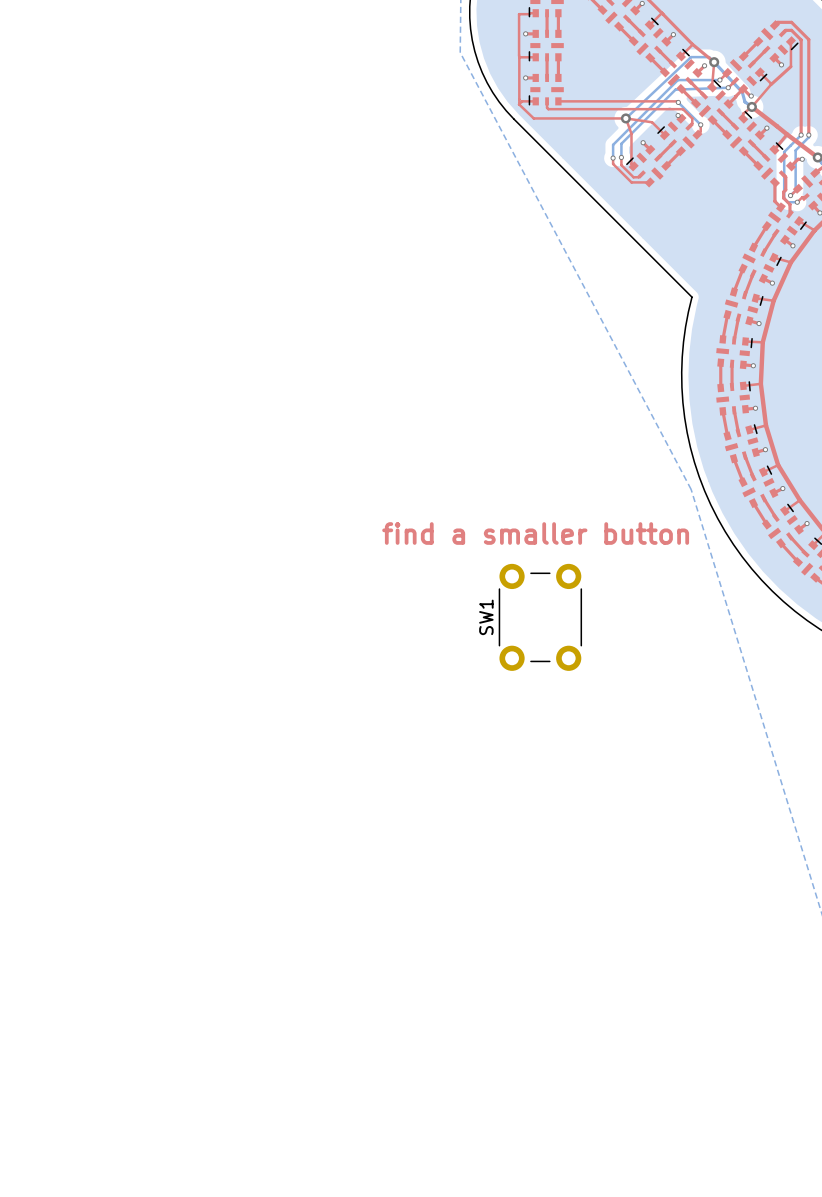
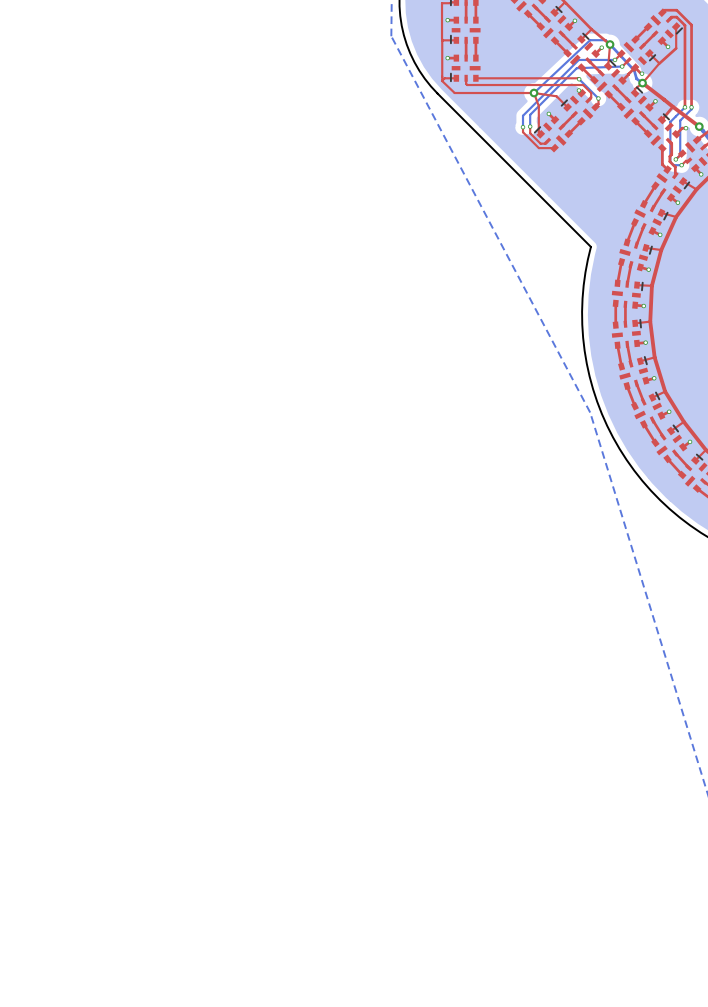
text: find a smaller button (535, 533) -> none
SW1: (540, 617) -> none

